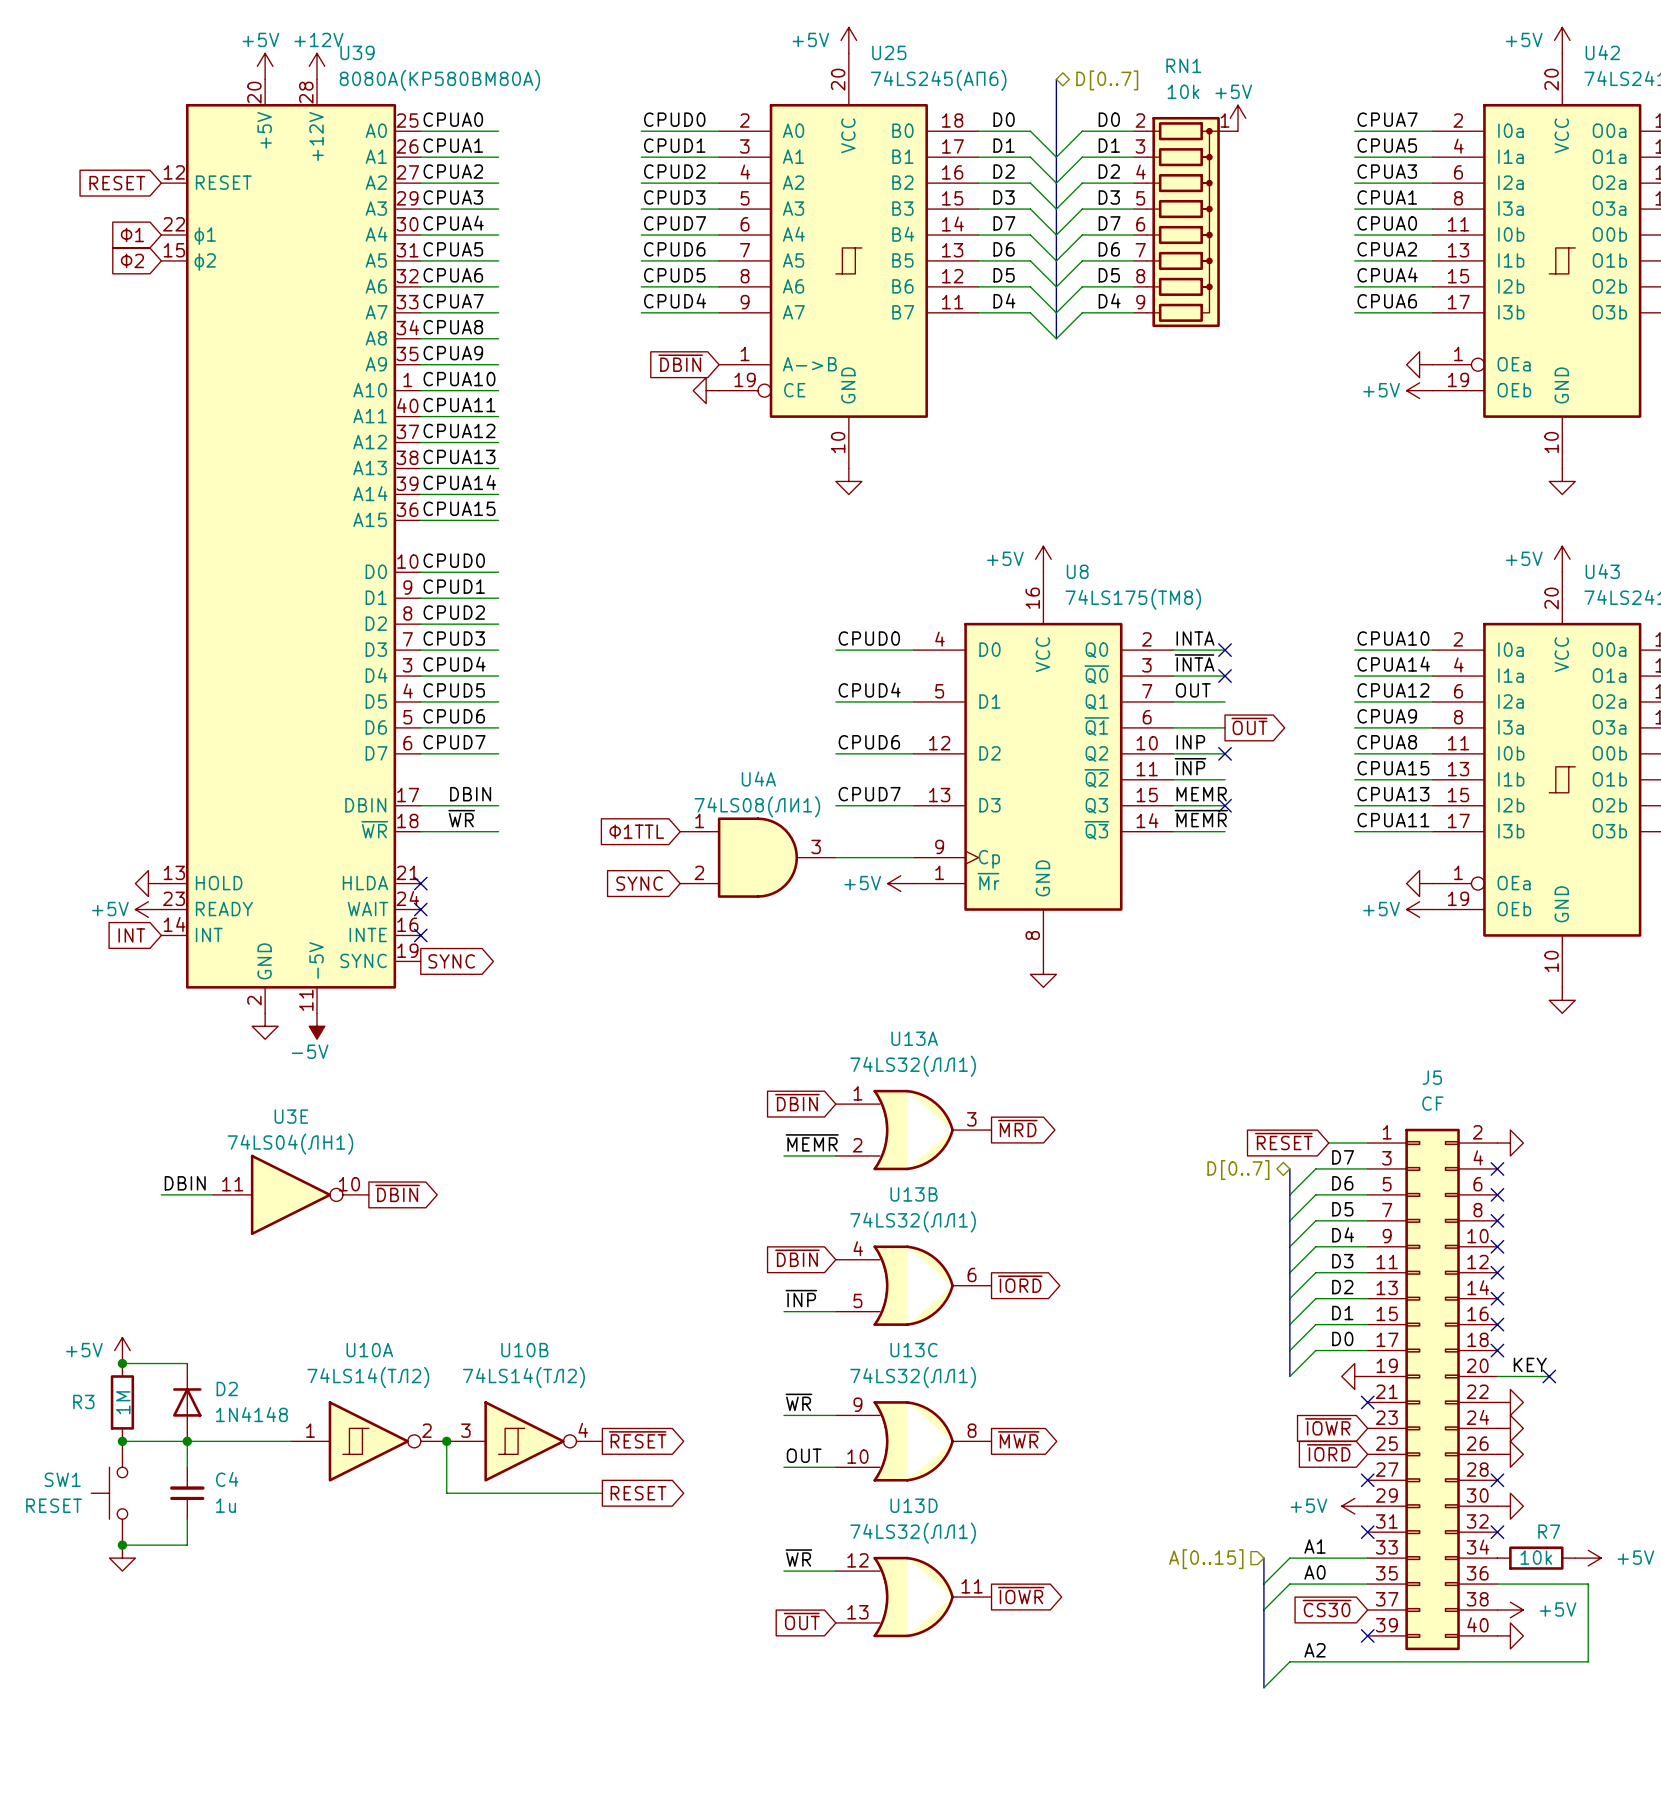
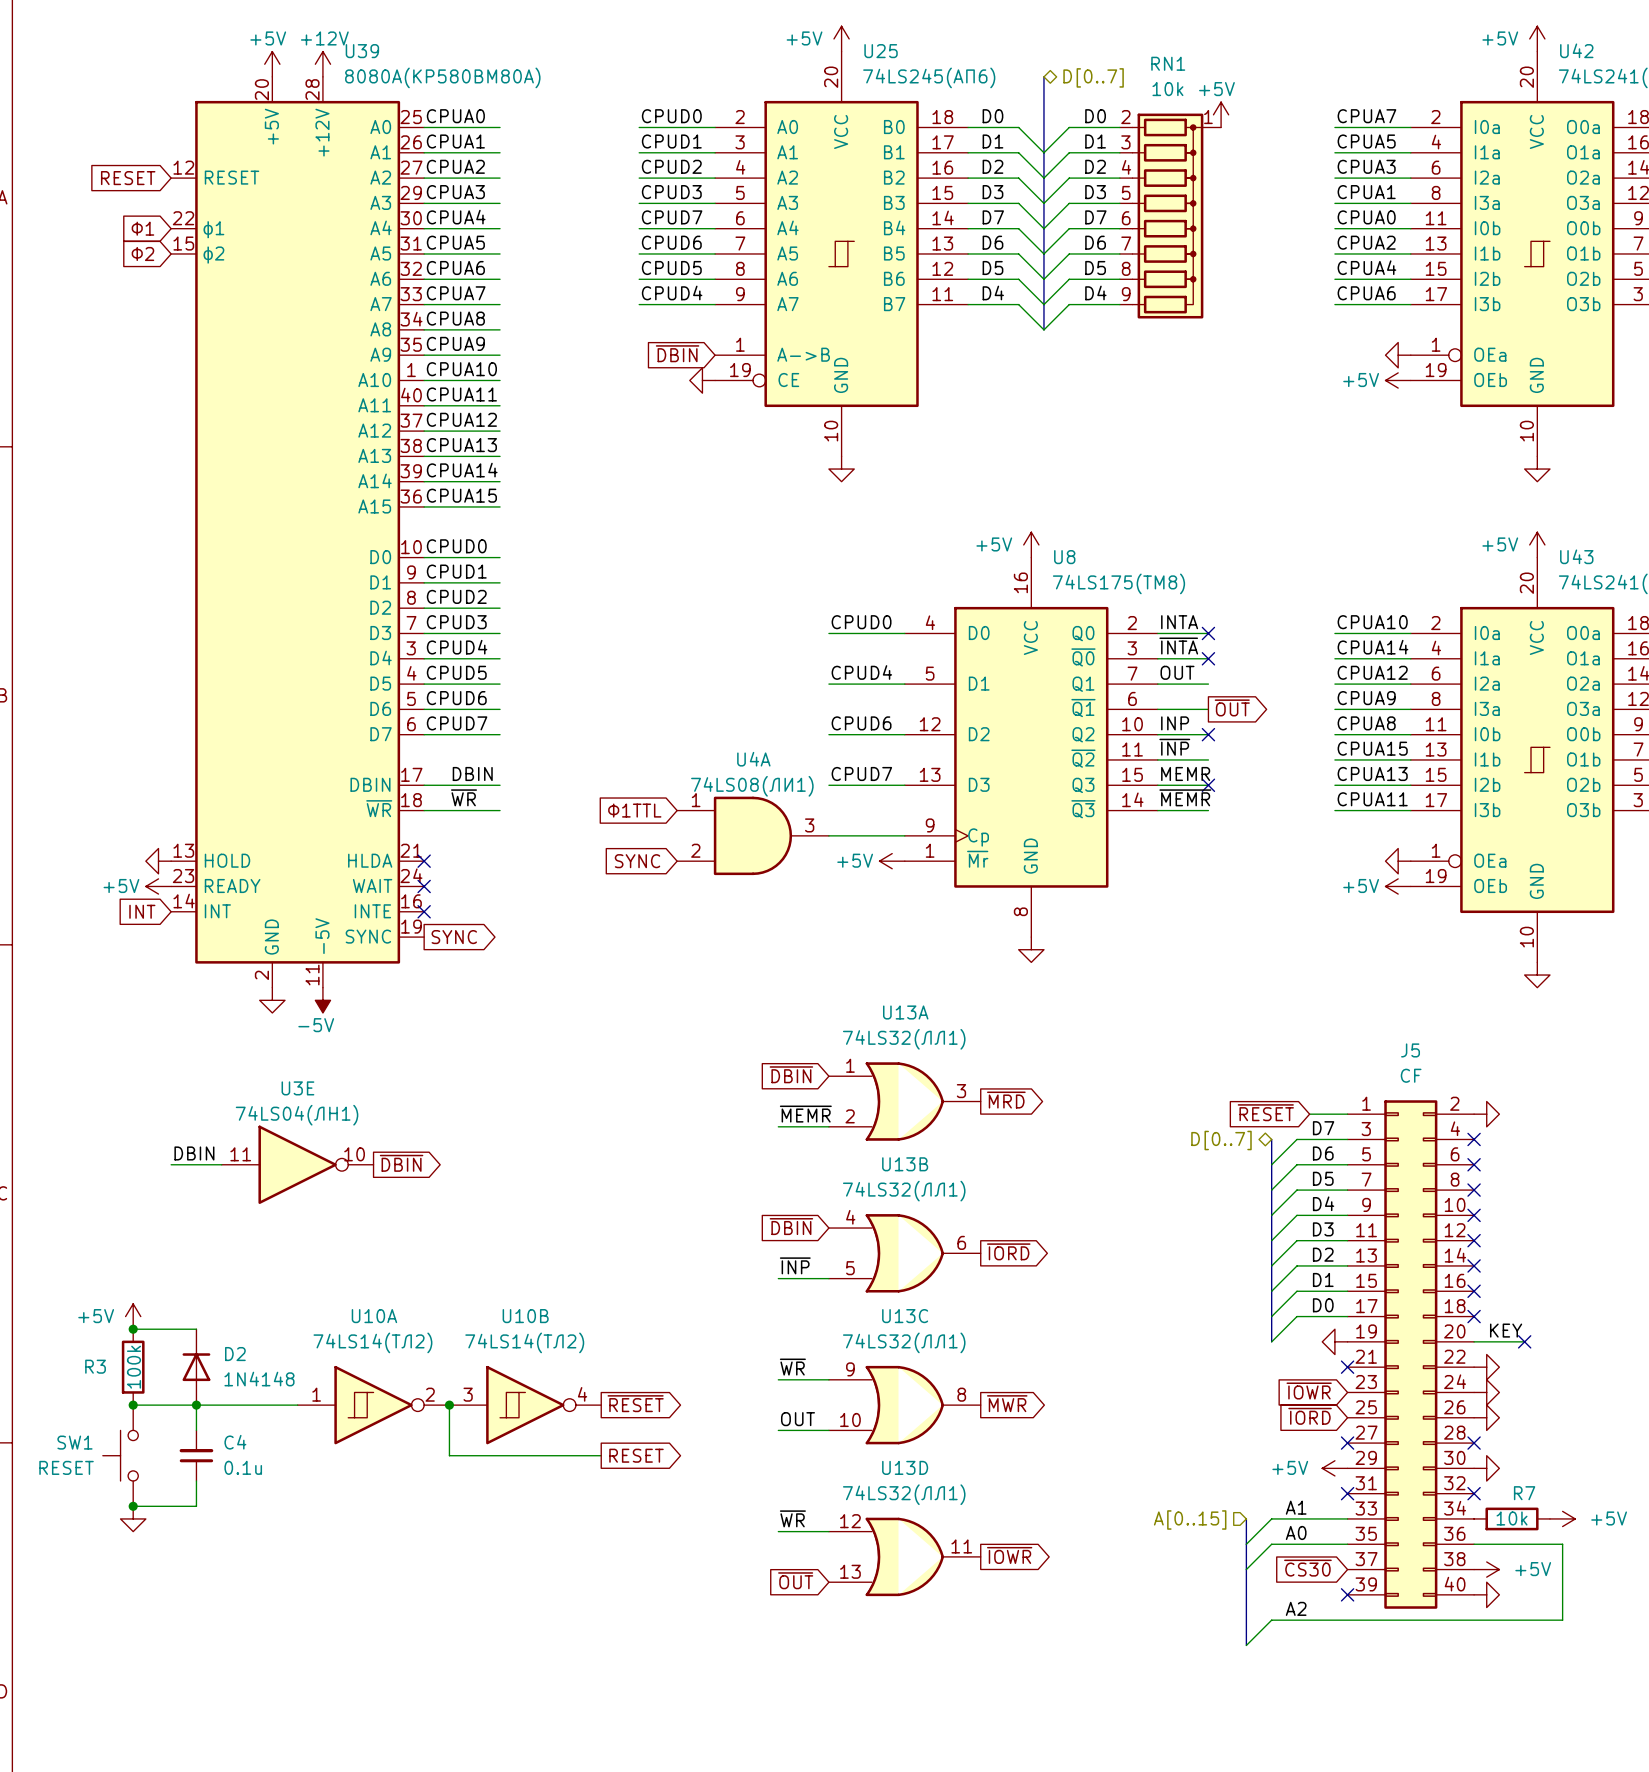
R3 value: 1M (123, 1402) -> 100k (133, 1367)
C4 value: 1u (225, 1505) -> 0.1u (243, 1467)

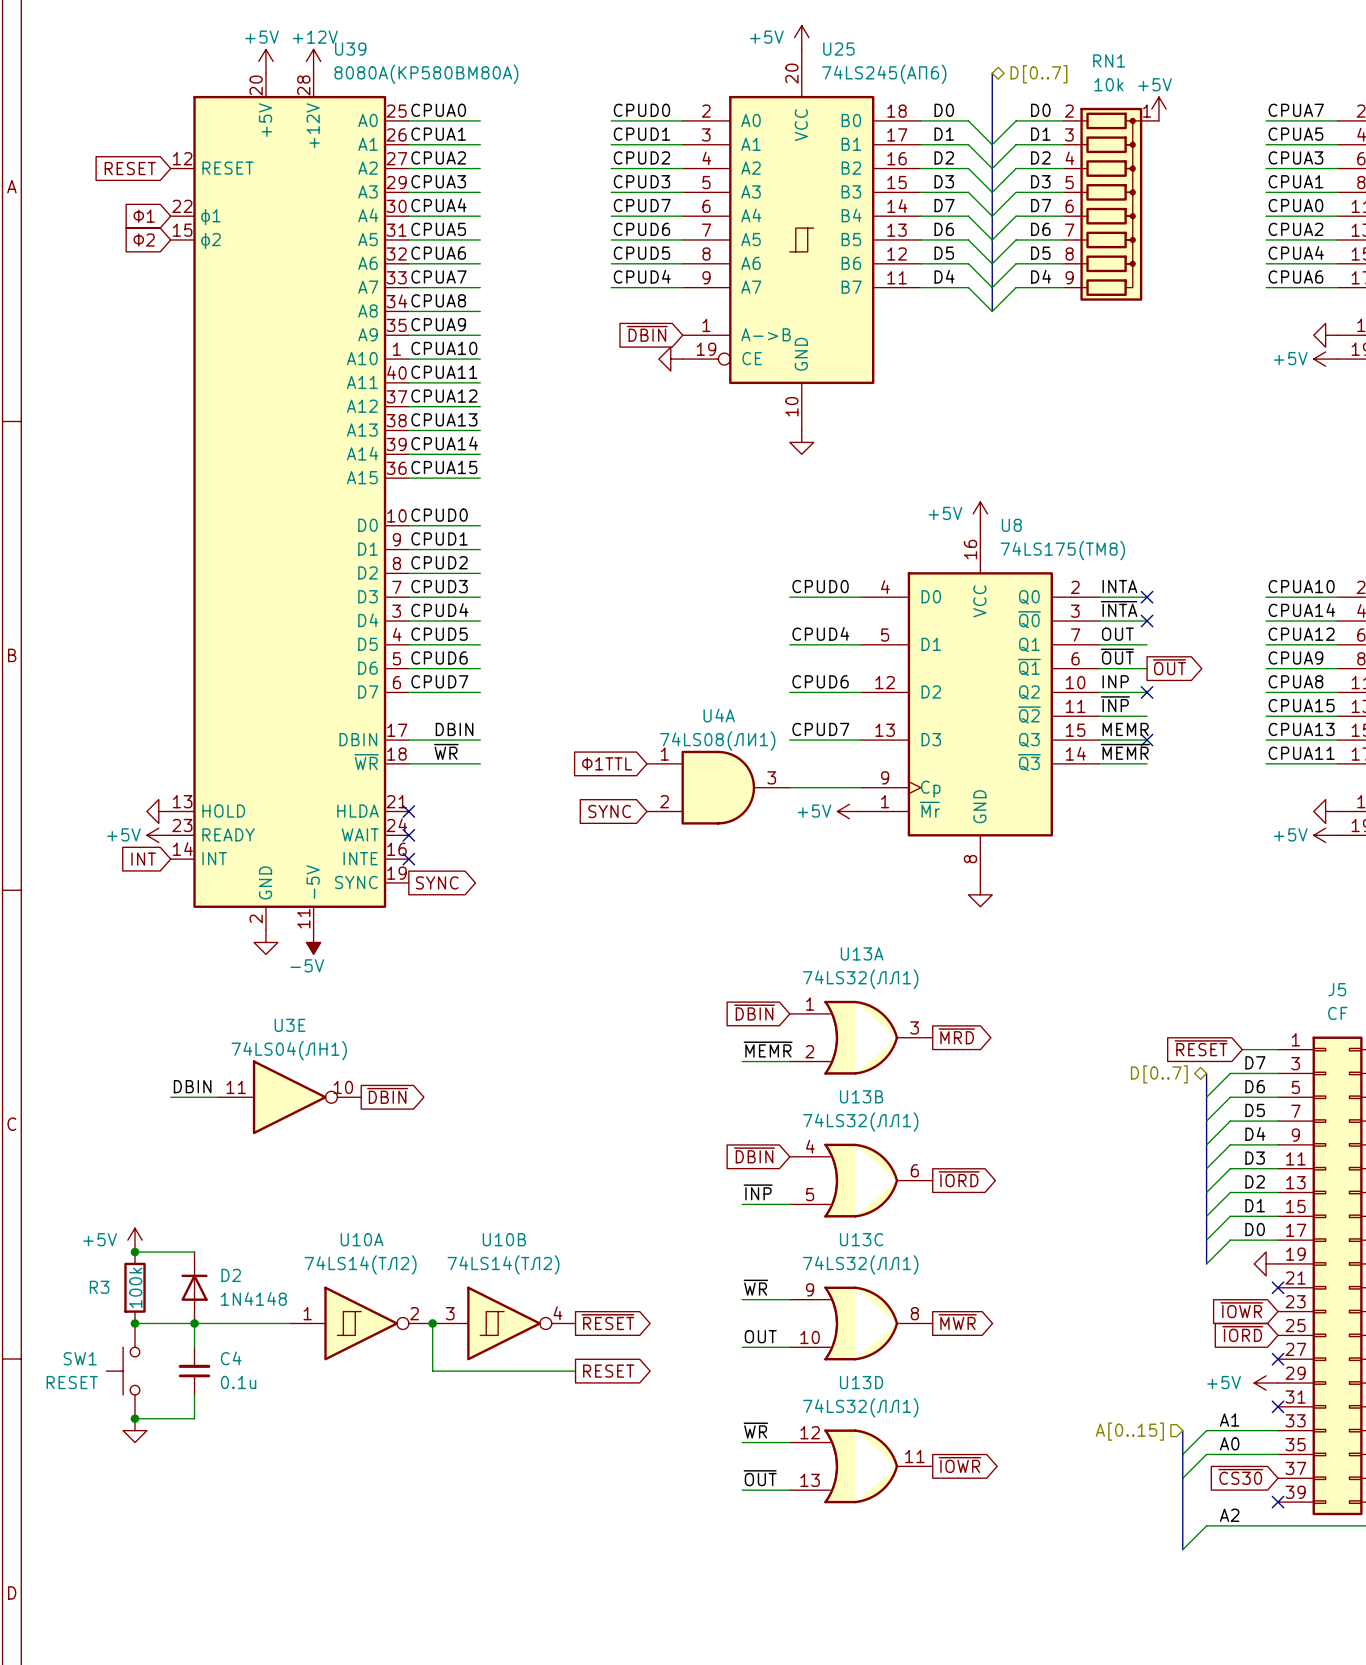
label: none -> ~{OUT} (1117, 656)
label: none -> ~{OUT} (760, 1478)
global label: ~{OUT} (795, 1580) -> none
wire: none -> (742, 1490) (789, 1490)

